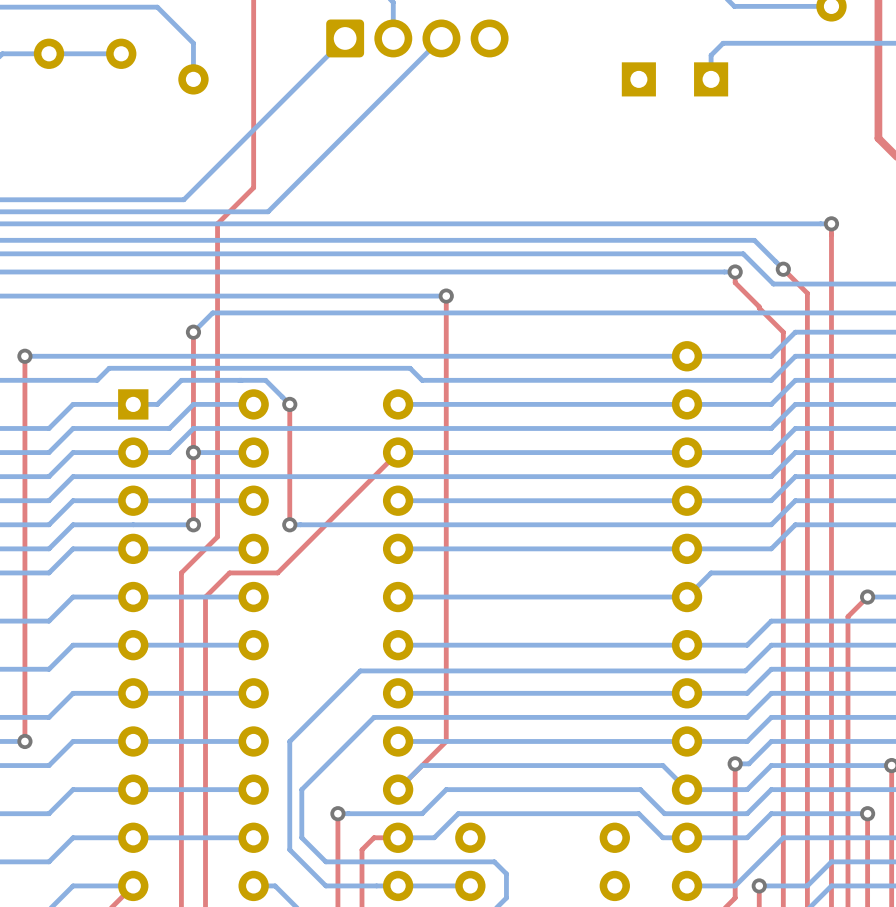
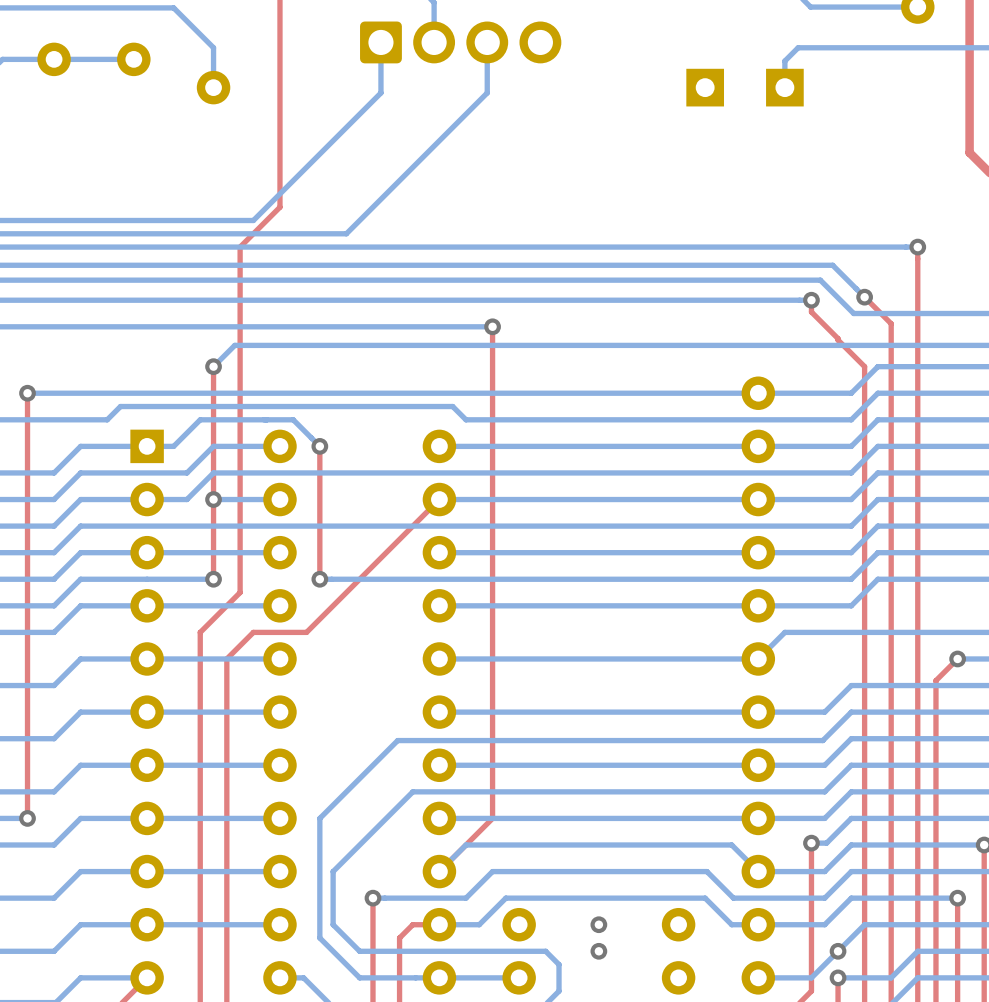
bottom track: (345, 38) (183, 199) -> (380, 42) (380, 92) (253, 220) (202, 220)
bottom track: (441, 38) (268, 211) -> (487, 42) (487, 92) (346, 233) (295, 233)
via: none -> (598, 924)
via: none -> (598, 951)
via: none -> (838, 951)

